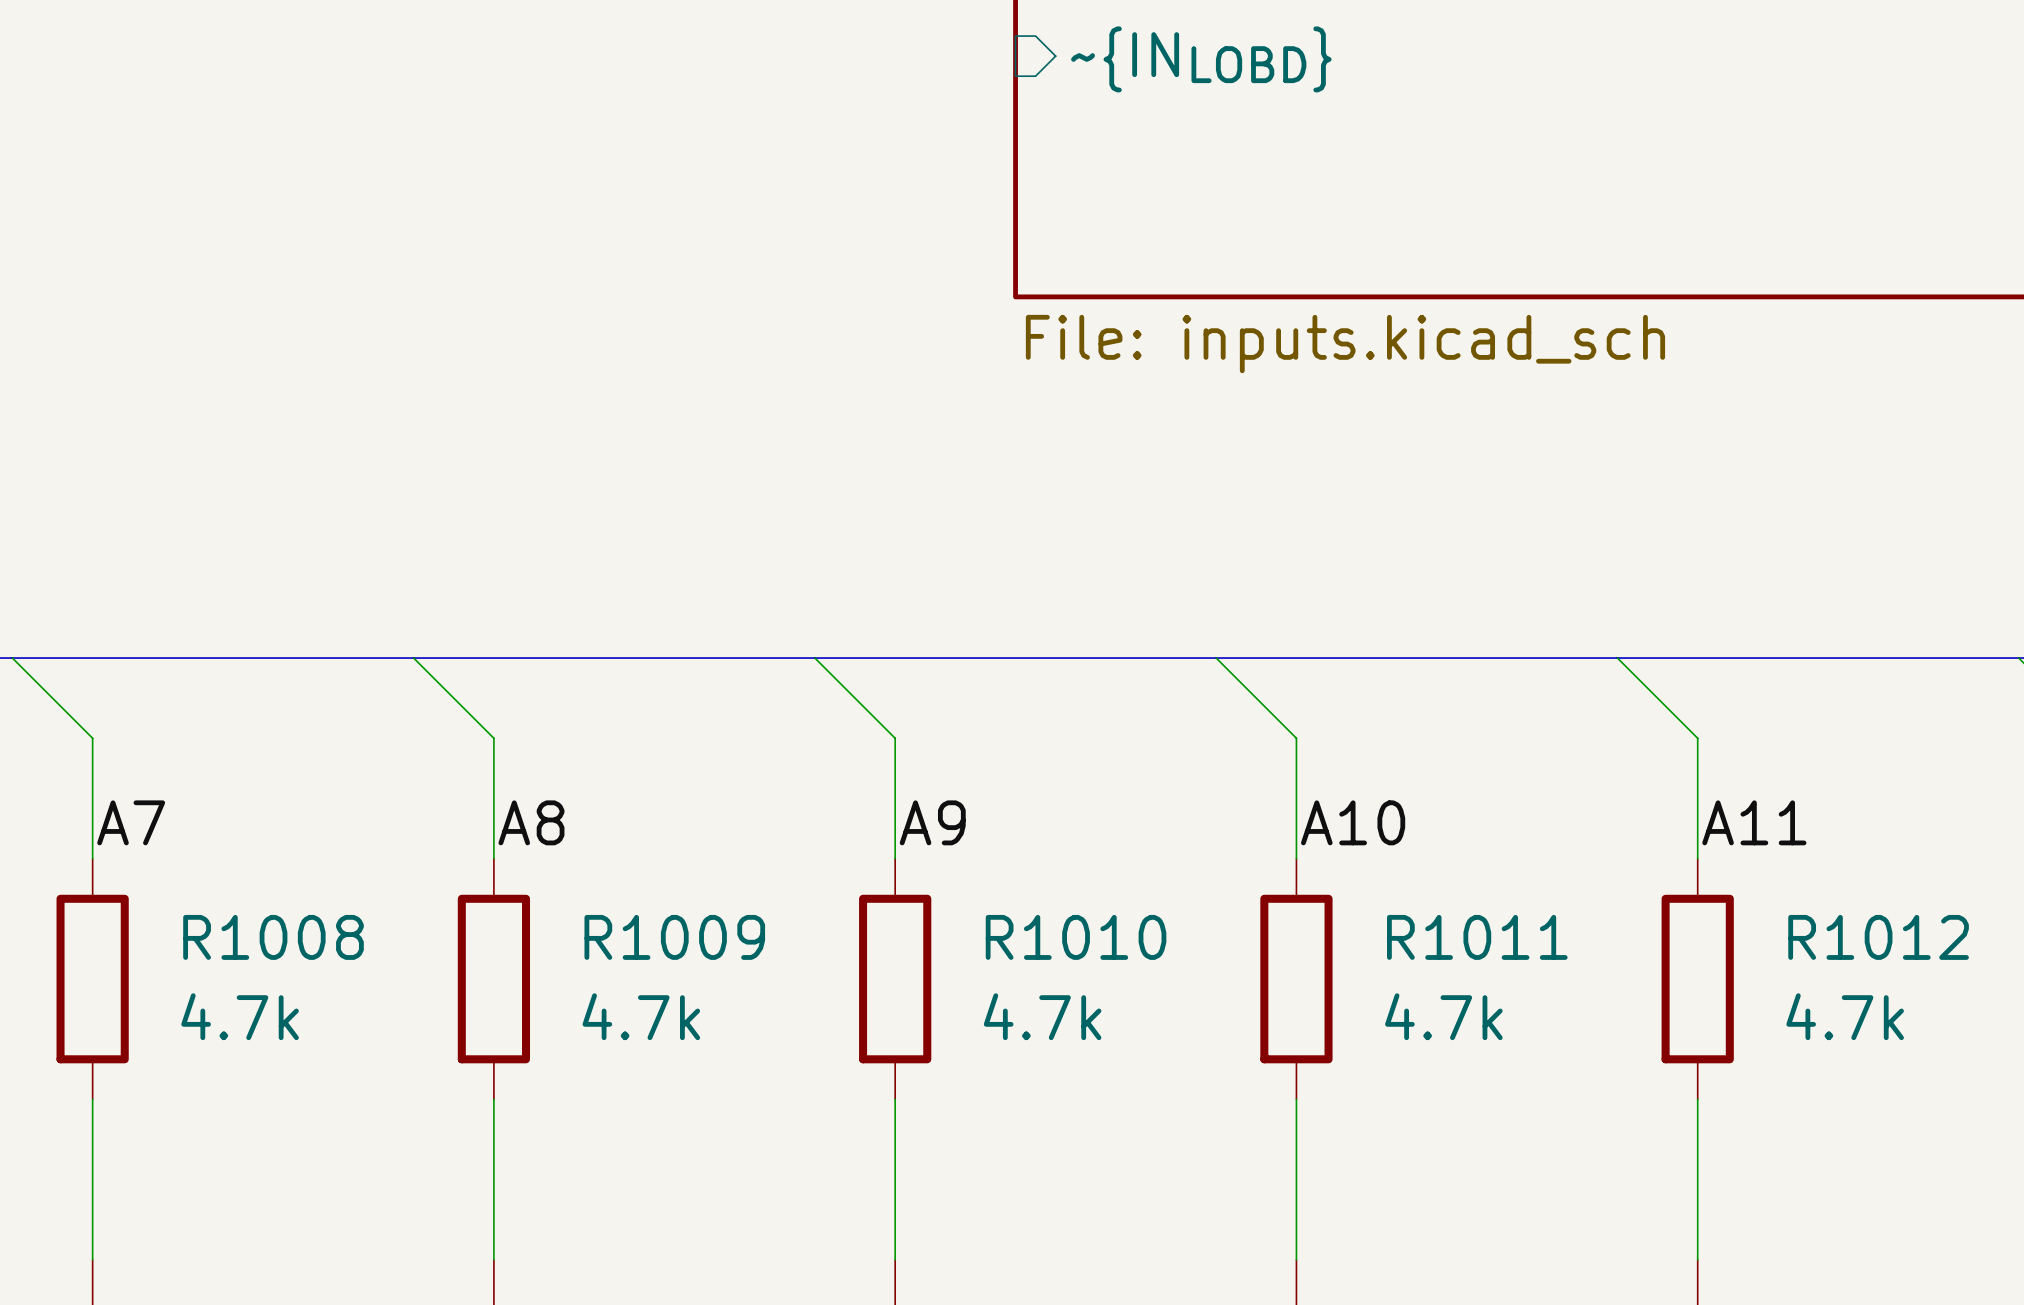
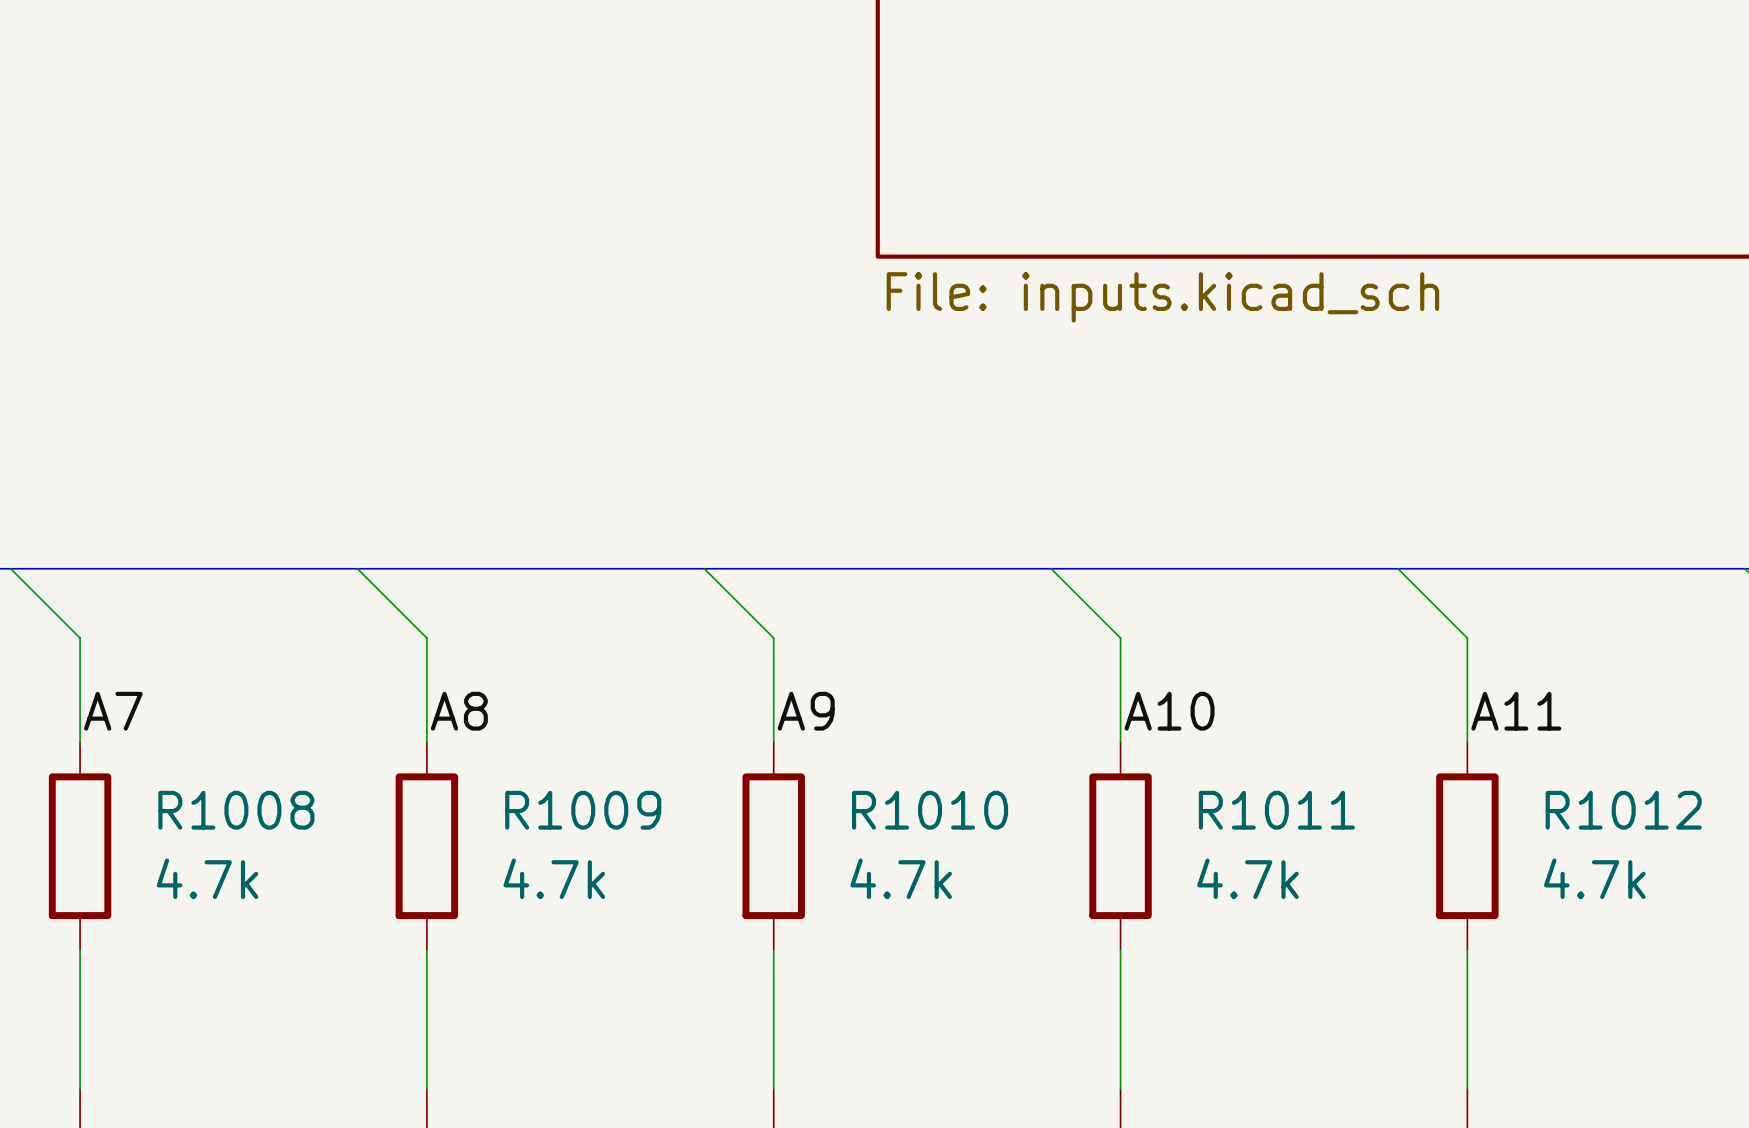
sheet pin: ~{INLOBD} (1201, 59) -> none

